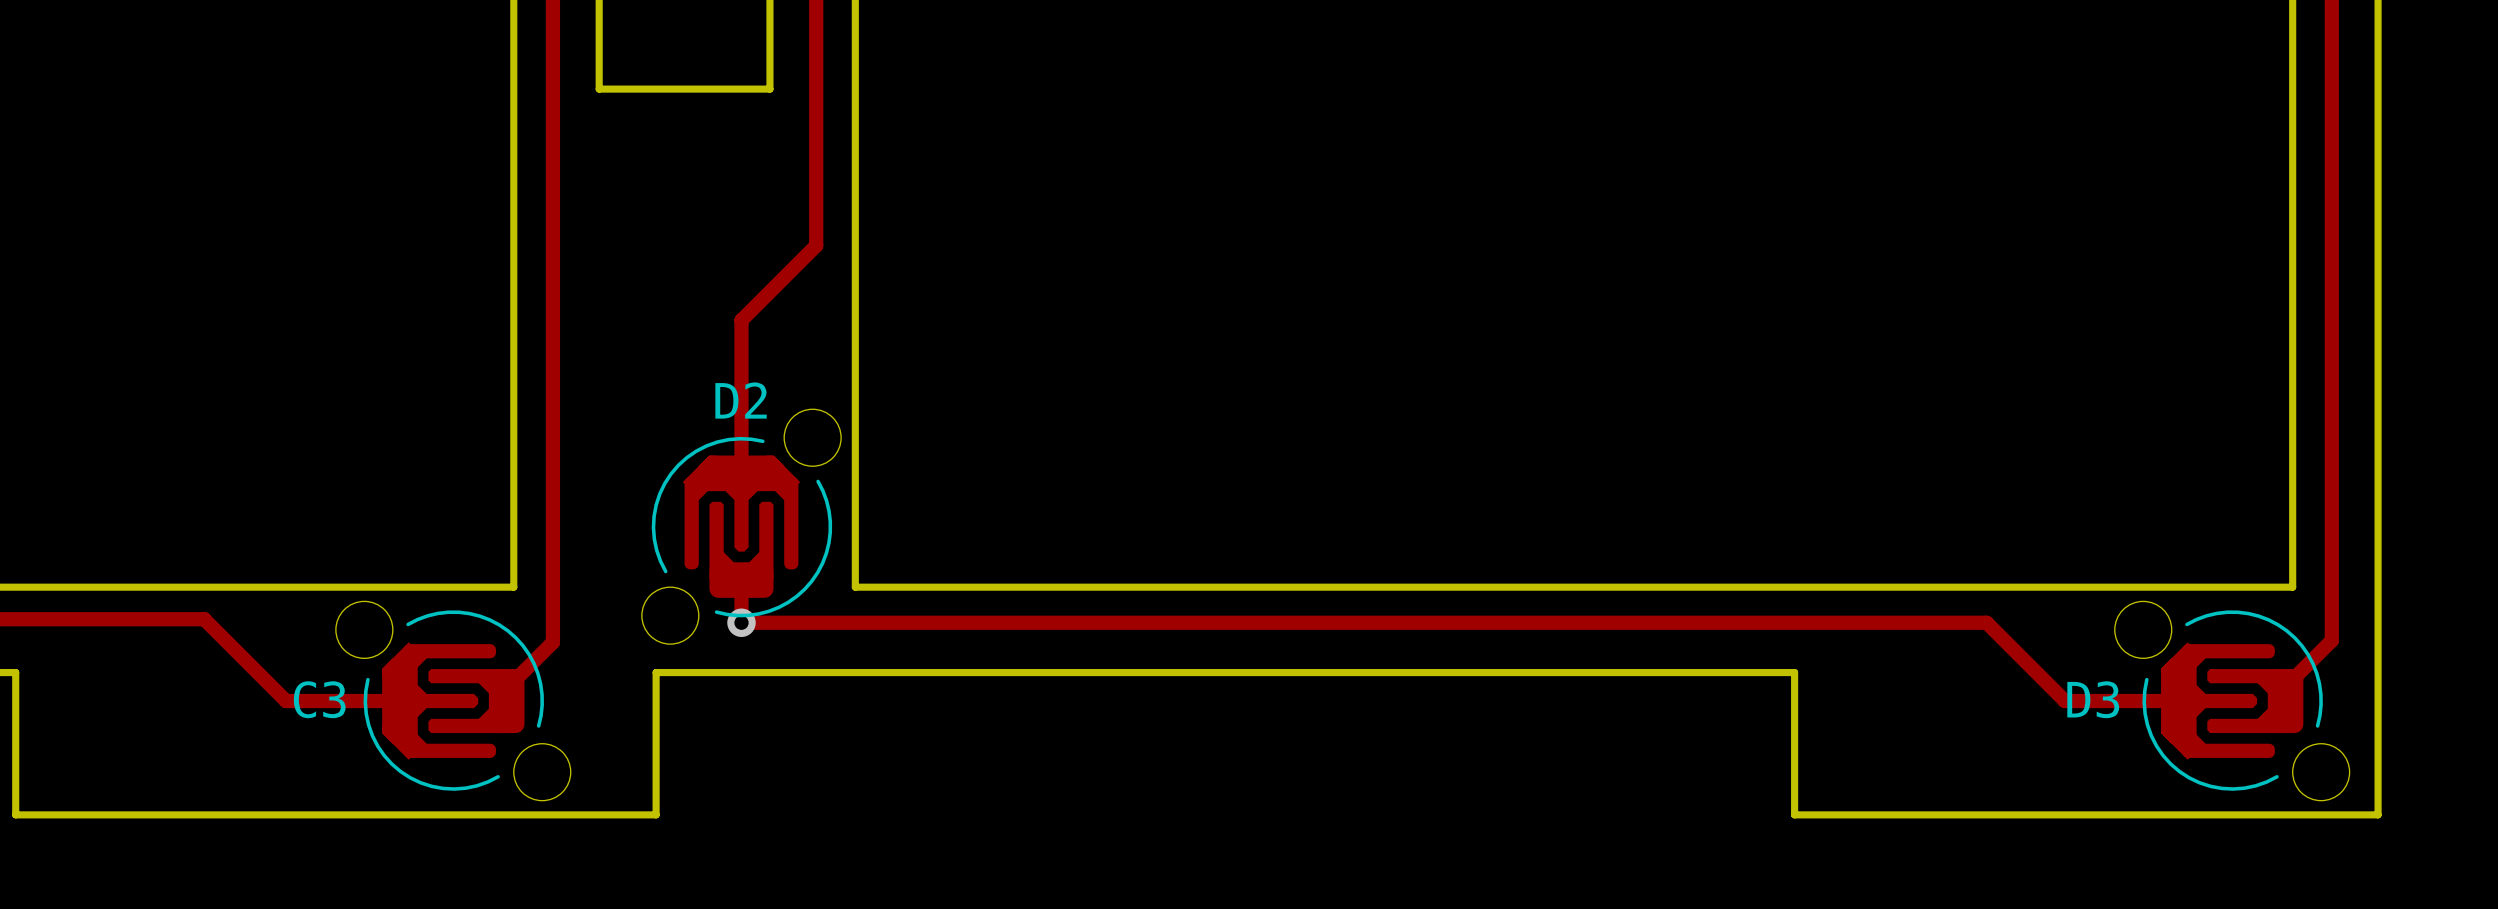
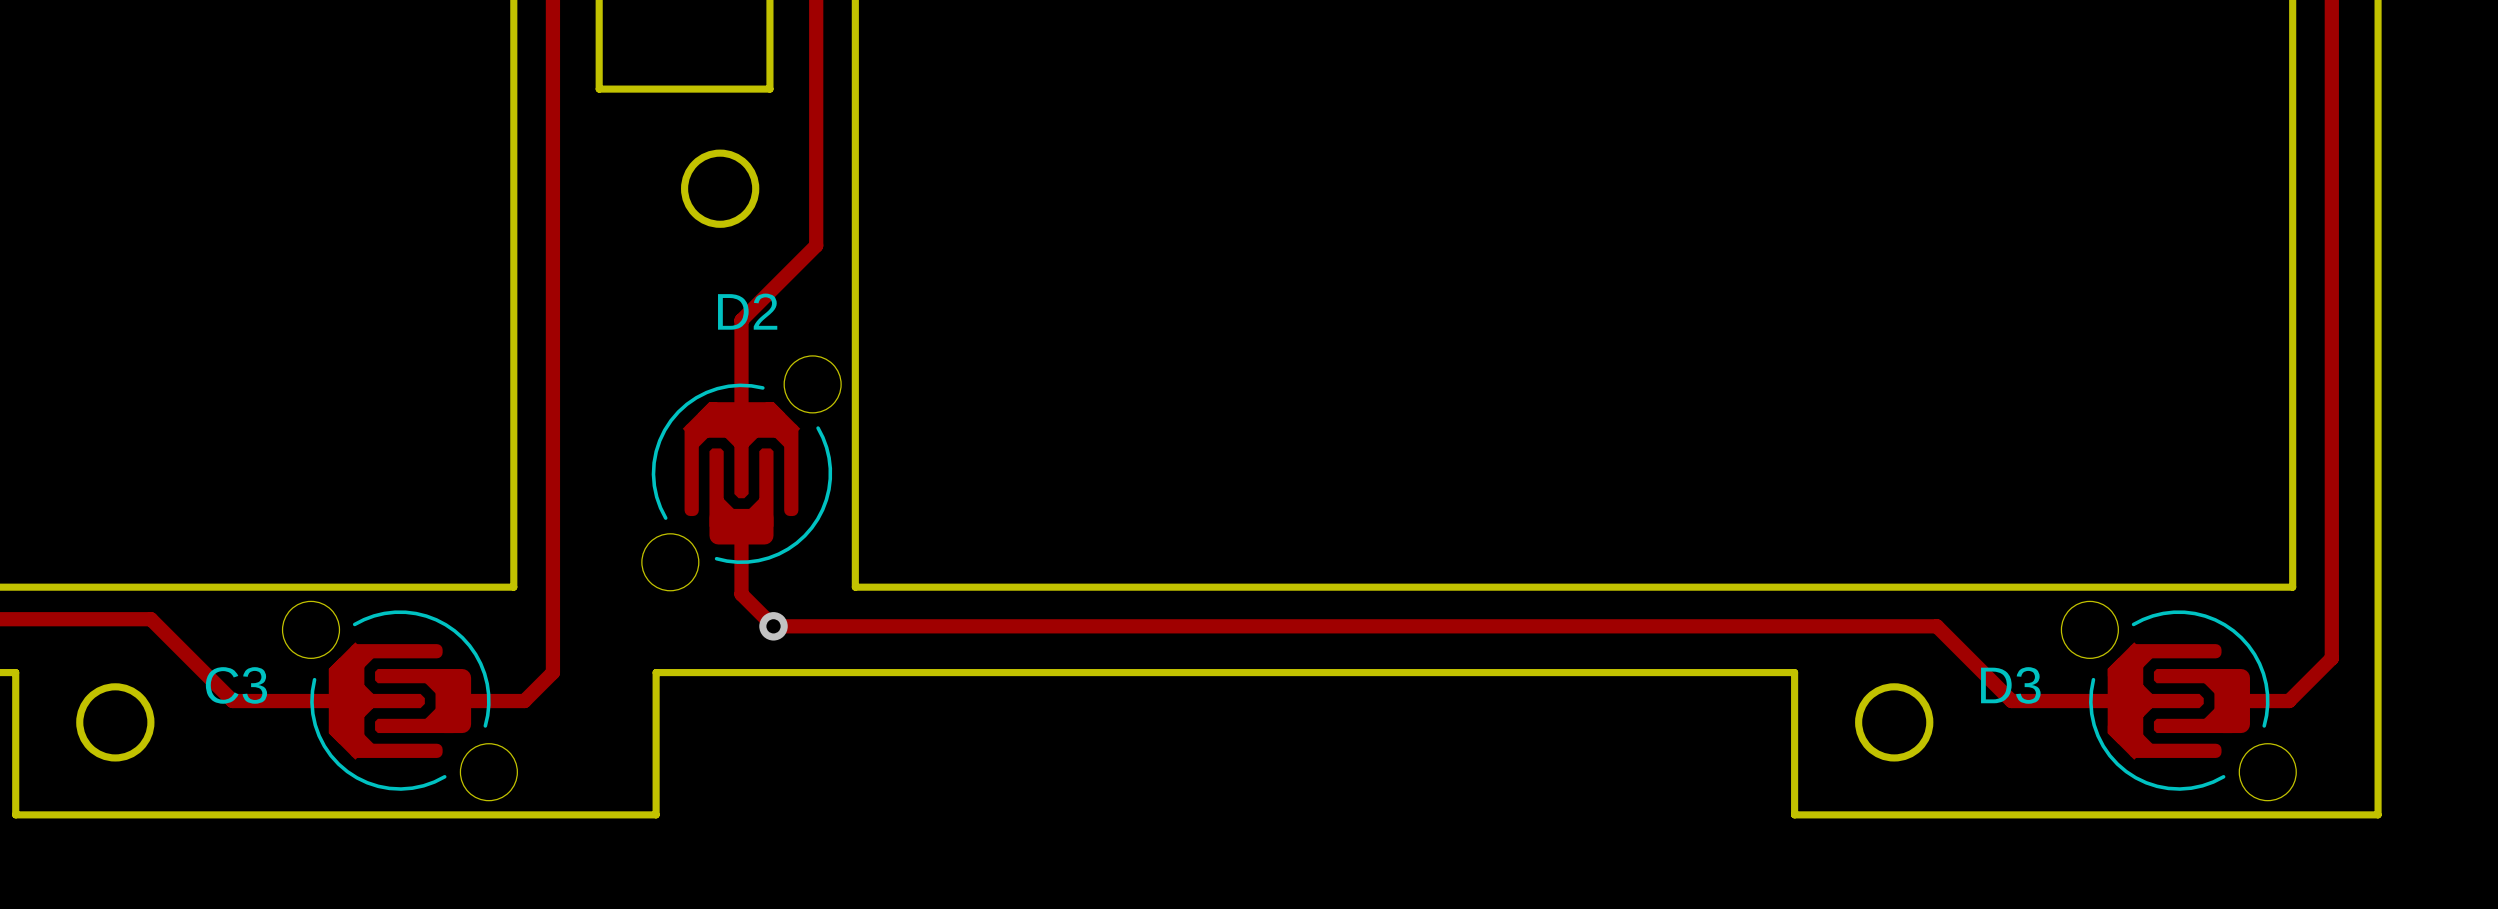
round board edge: none -> [681, 149, 760, 228]
D2 name position: D2 (741, 400) -> D2 (747, 311)
track: (741, 419) (741, 473) -> (741, 526) (741, 580)
D2 position: (741, 526) -> (741, 473)
track: (741, 594) (741, 622) (1986, 622) (2064, 701) -> (741, 594) (773, 626) (1936, 626) (2011, 701) (2064, 701)
track: (150, 619) (204, 619) (286, 701) -> (150, 619) (232, 701) (286, 701)
via position: (741, 622) -> (773, 626)
track: (2331, 640) (2285, 686) (2285, 701) -> (2331, 640) (2331, 658) (2289, 701) (2232, 701)
track: (552, 642) (506, 688) (506, 701) -> (552, 642) (552, 672) (524, 701) (453, 701)
round board edge: none -> [76, 683, 155, 762]
round board edge: none -> [1855, 683, 1934, 762]
C3 name position: C3 (319, 699) -> C3 (236, 685)
D3 name position: D3 (2093, 699) -> D3 (2010, 685)
track: (346, 701) (399, 701) -> none
C3 position: (453, 701) -> (399, 701)
track: (2125, 701) (2178, 701) -> none
D3 position: (2232, 701) -> (2178, 701)

